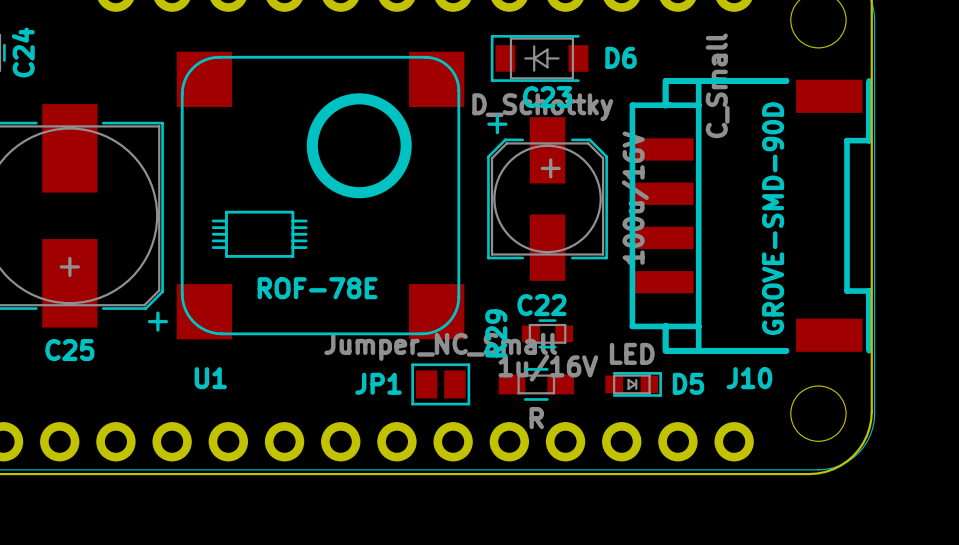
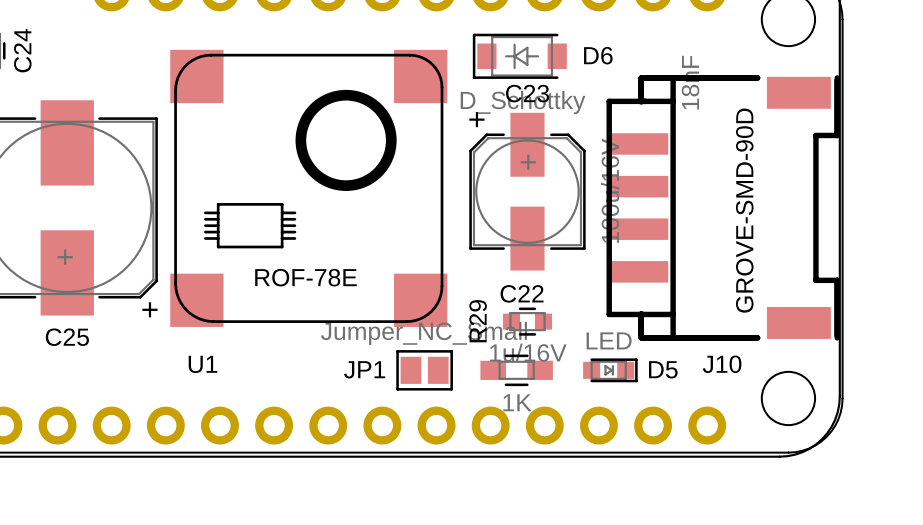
part value: C_Small (717, 85) -> 18nF (690, 82)
R29 value: R (536, 418) -> 1K (517, 402)

